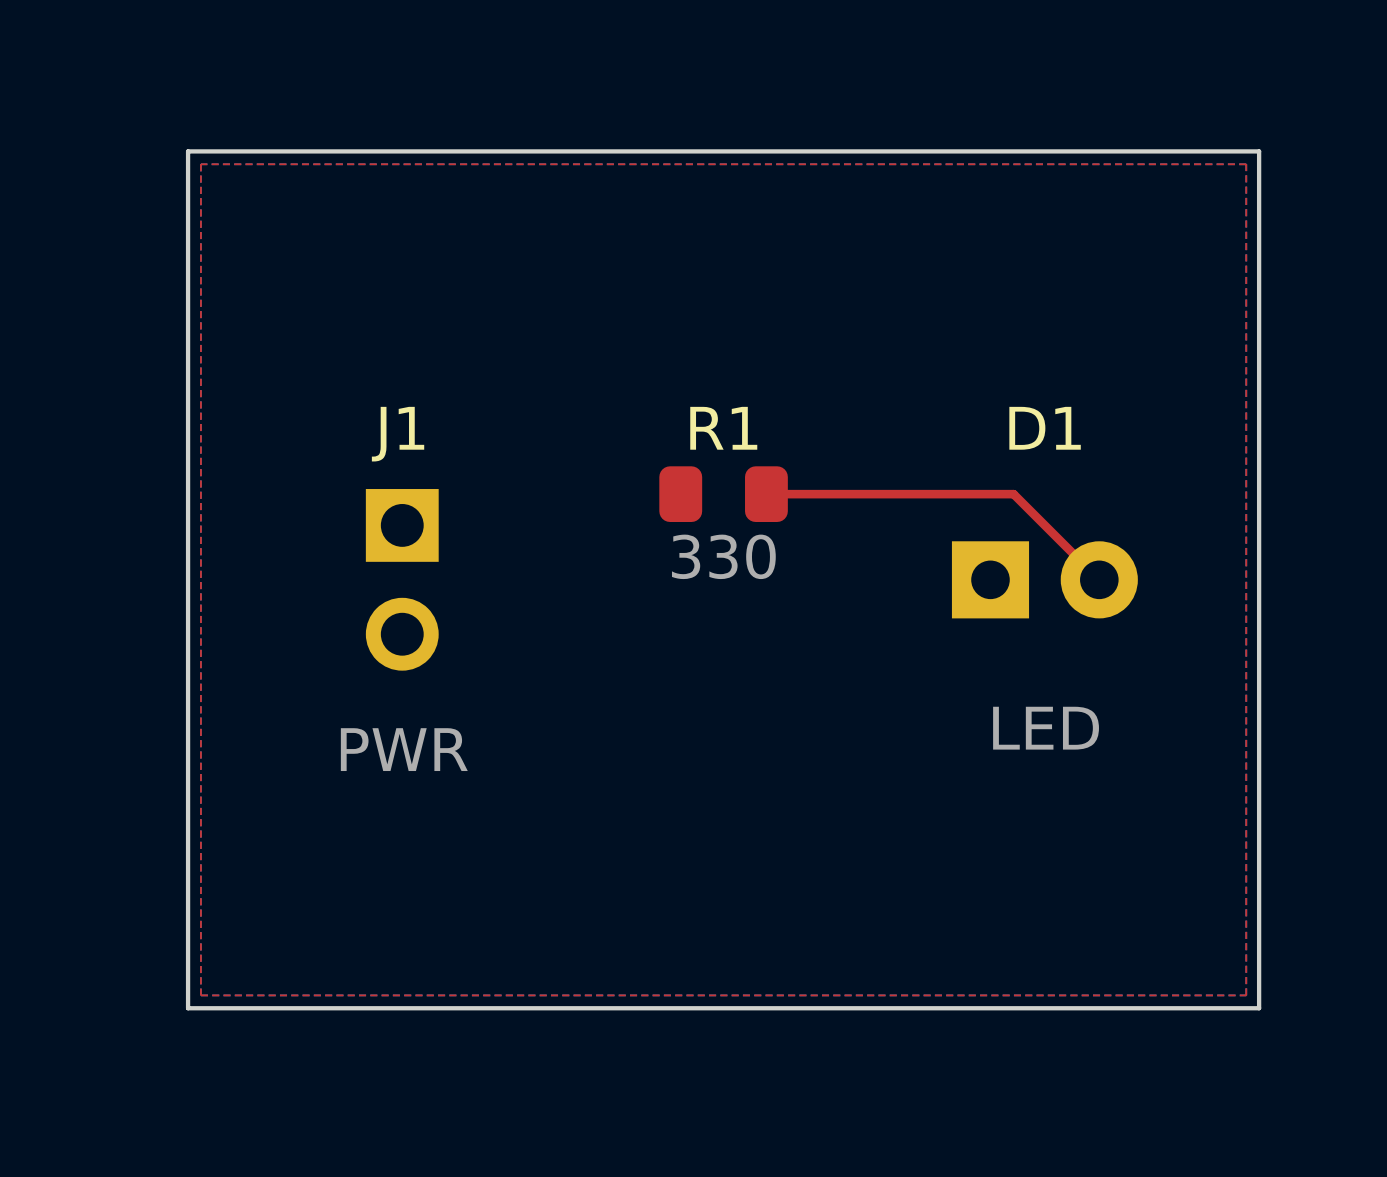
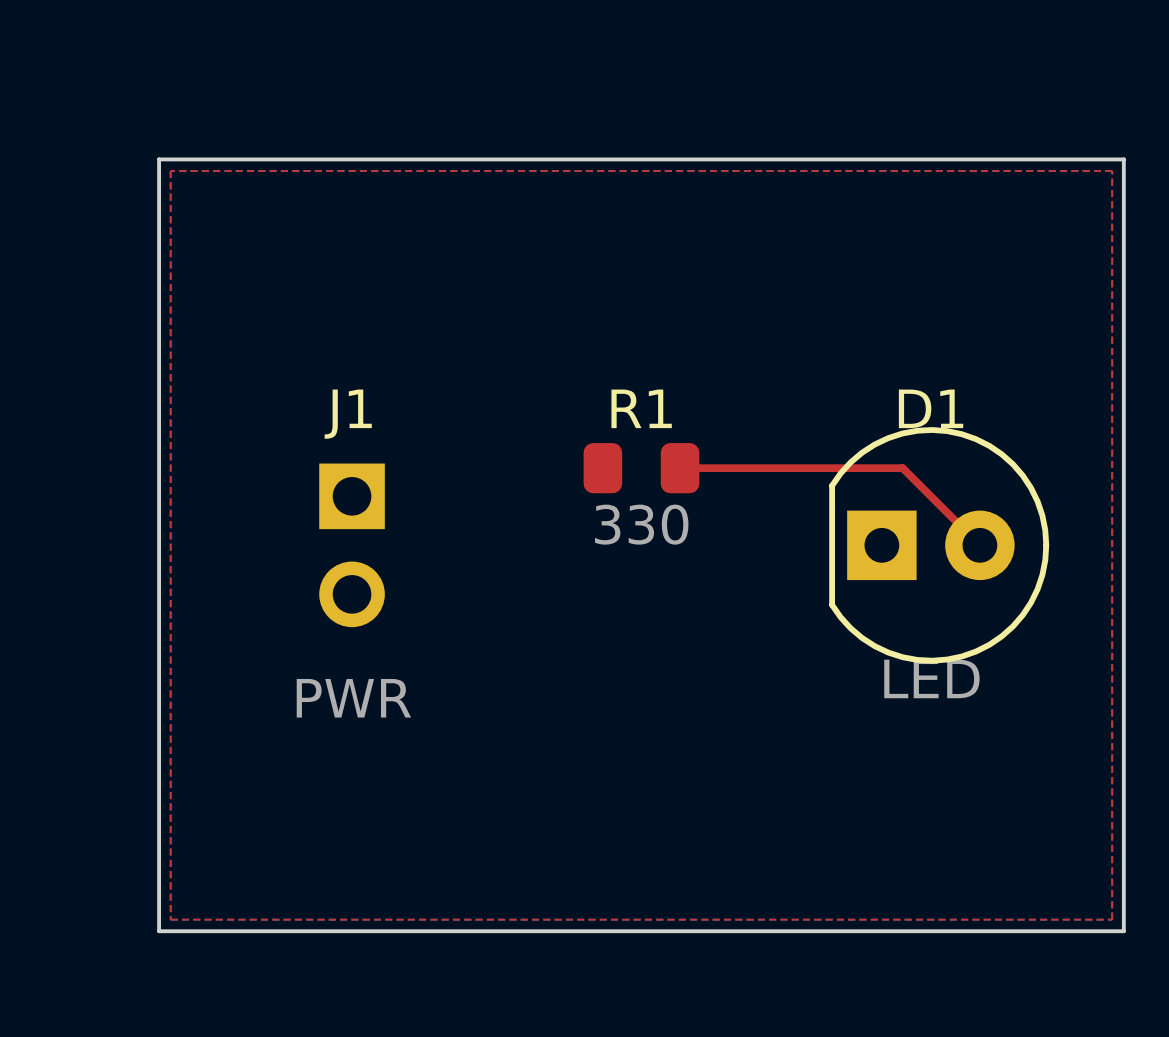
D1 footprint: [951, 541, 1138, 619] -> [829, 427, 1050, 664]

